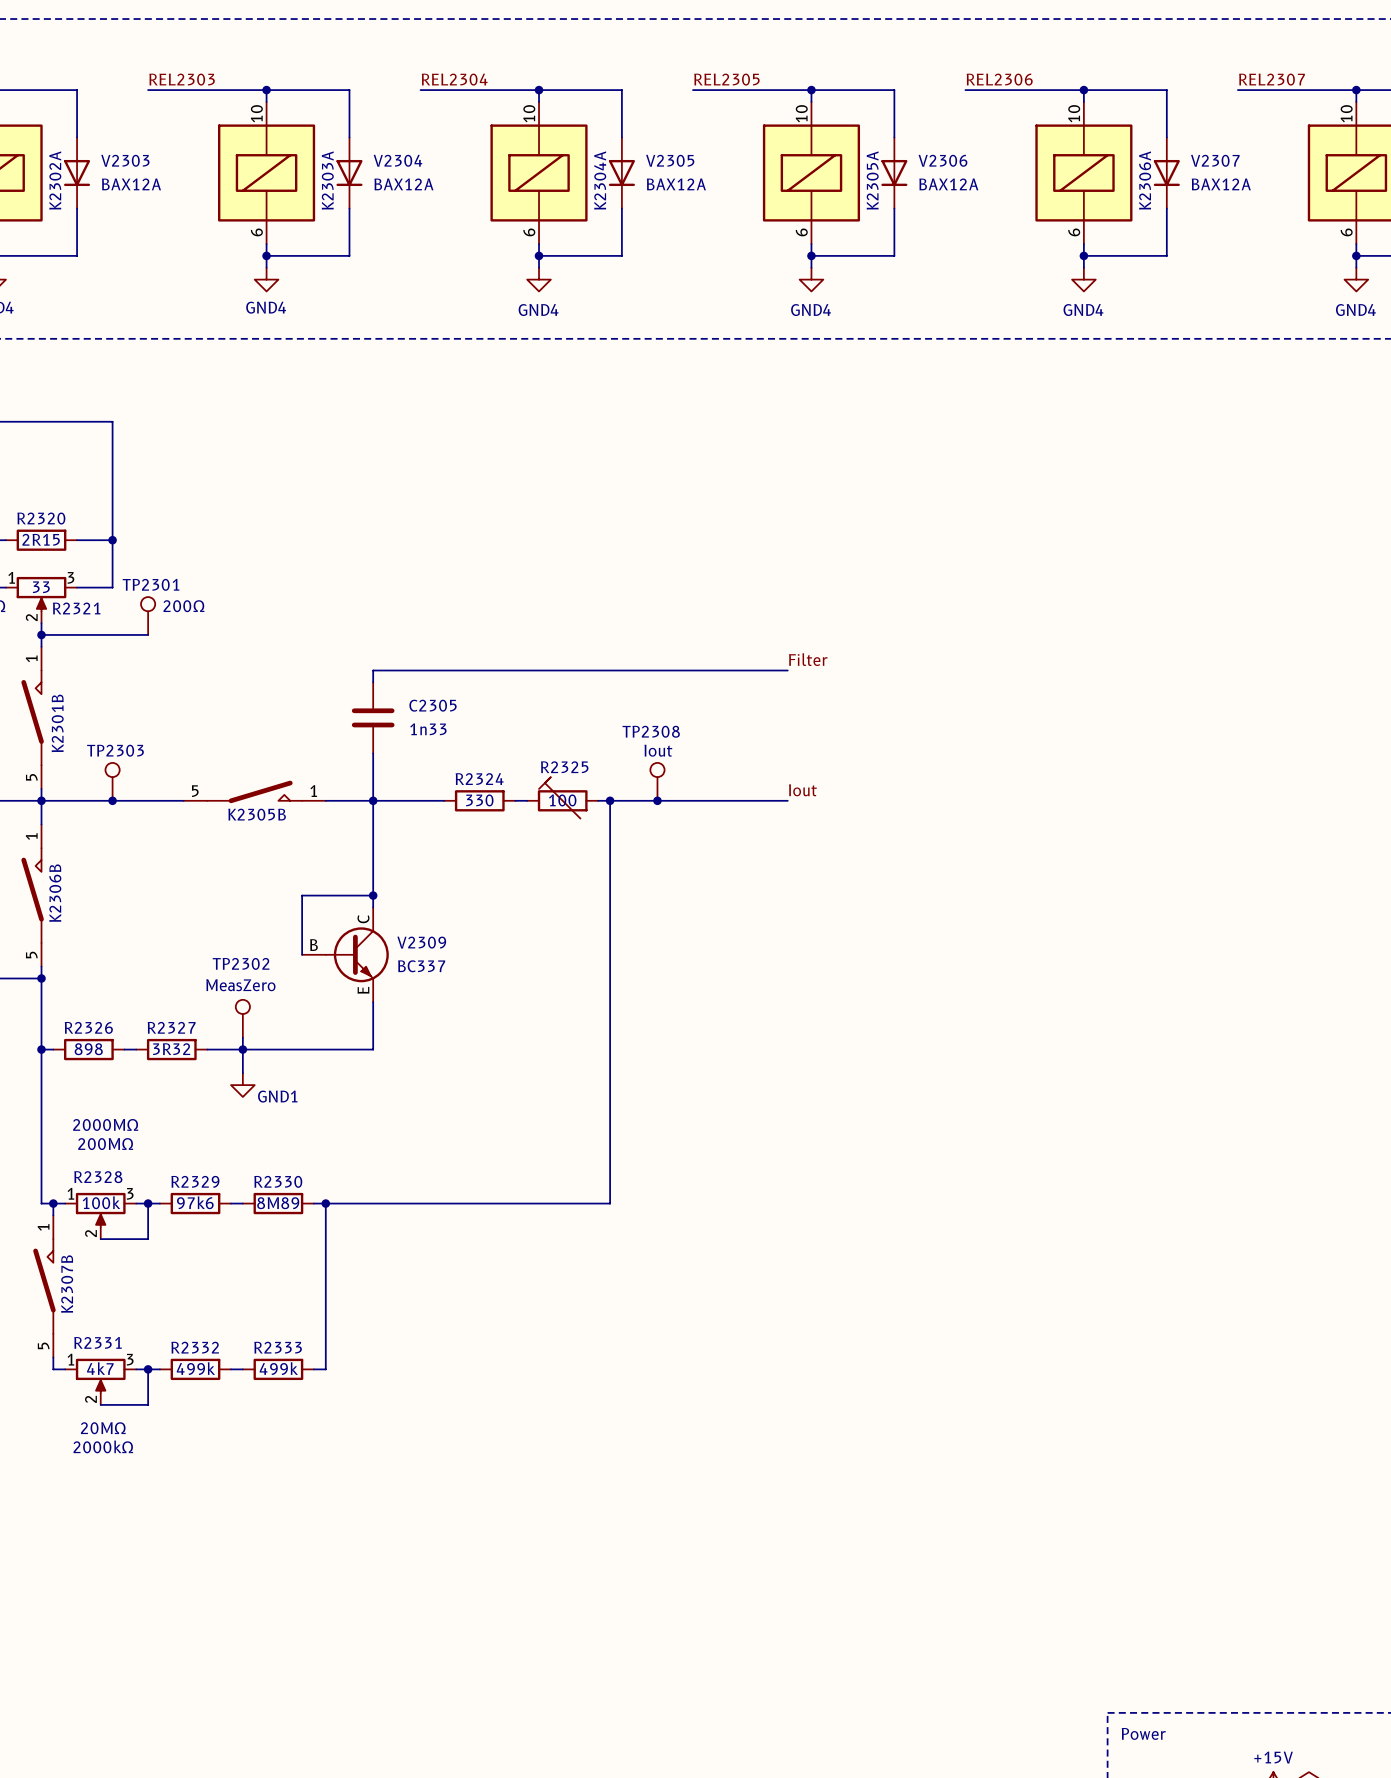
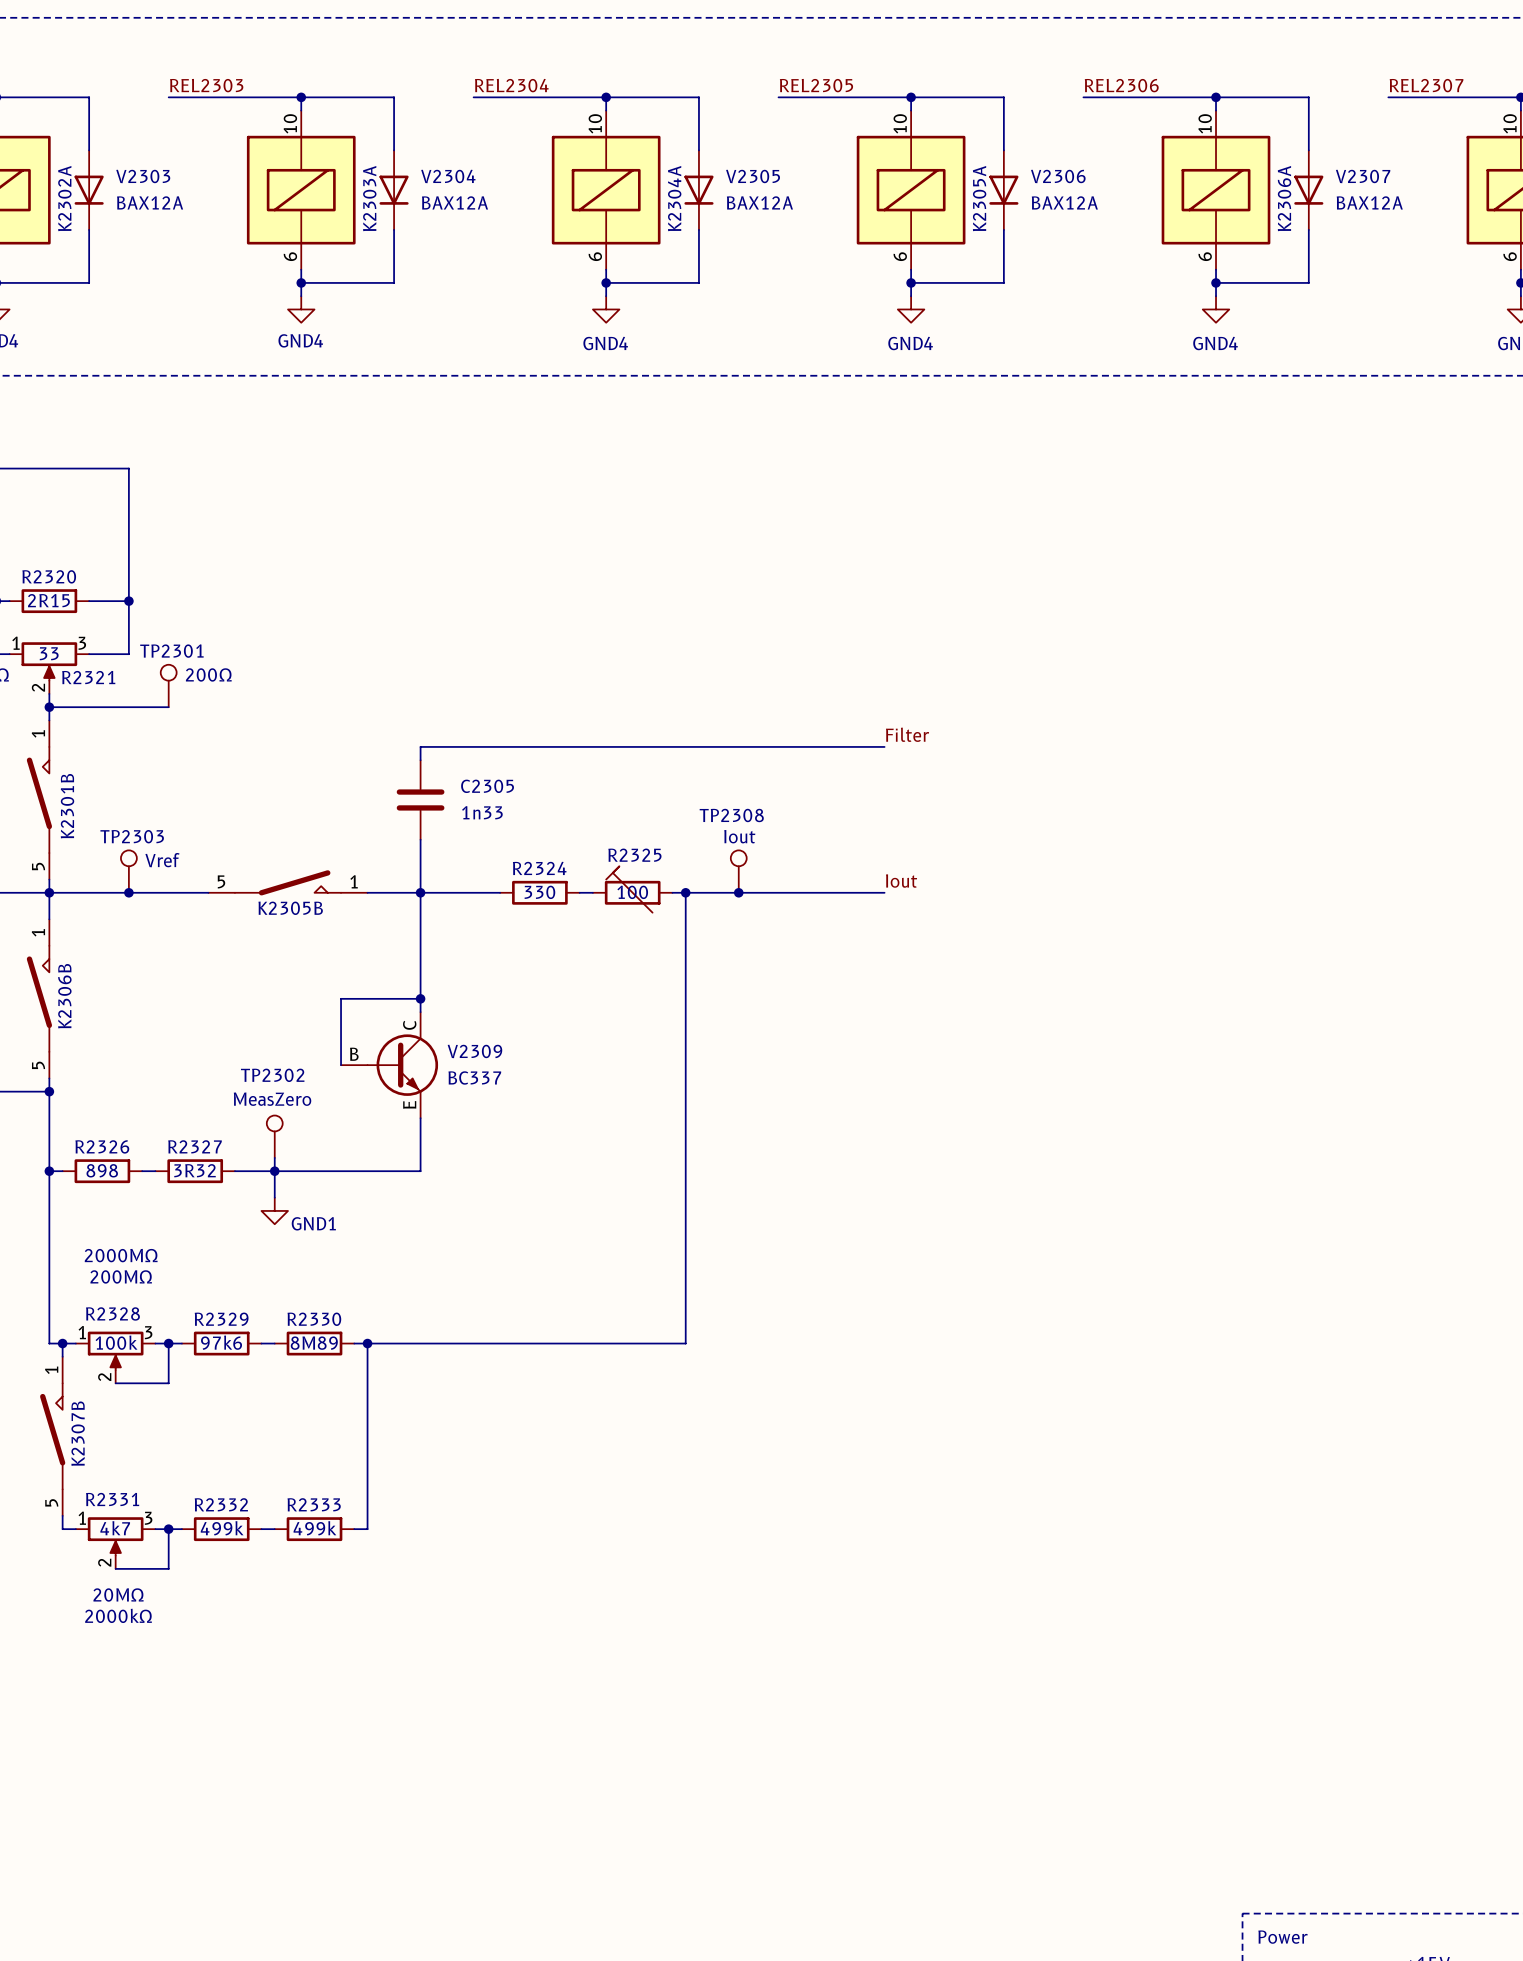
TP2303 value: none -> Vref (162, 860)

